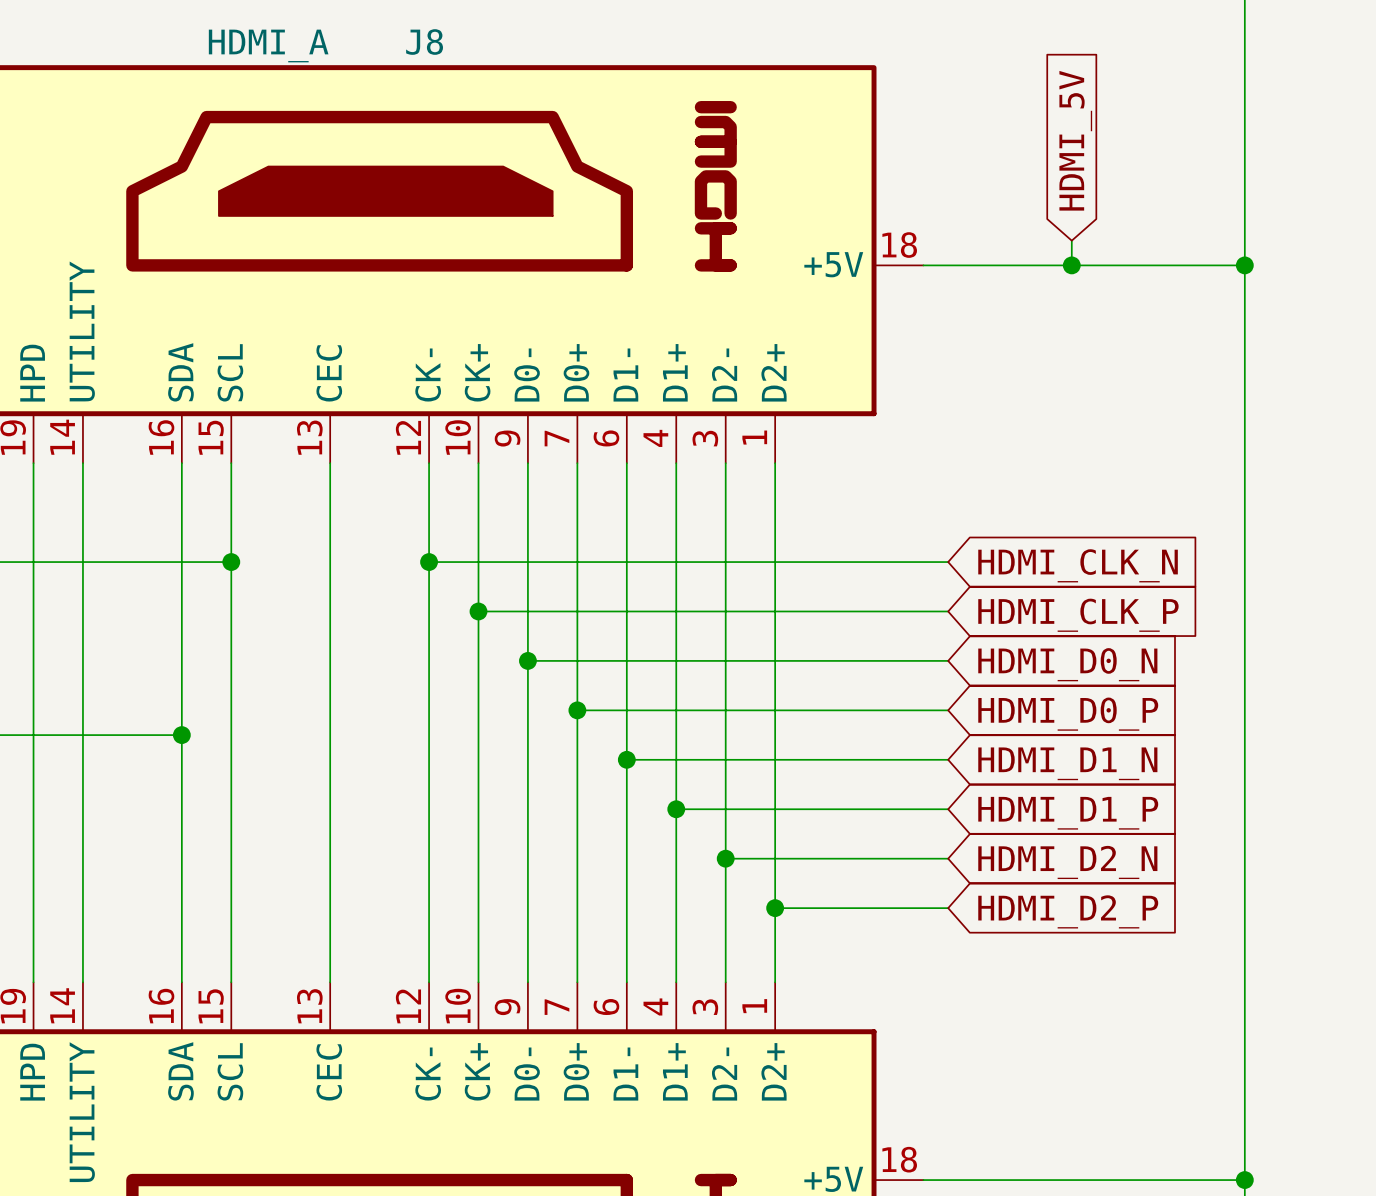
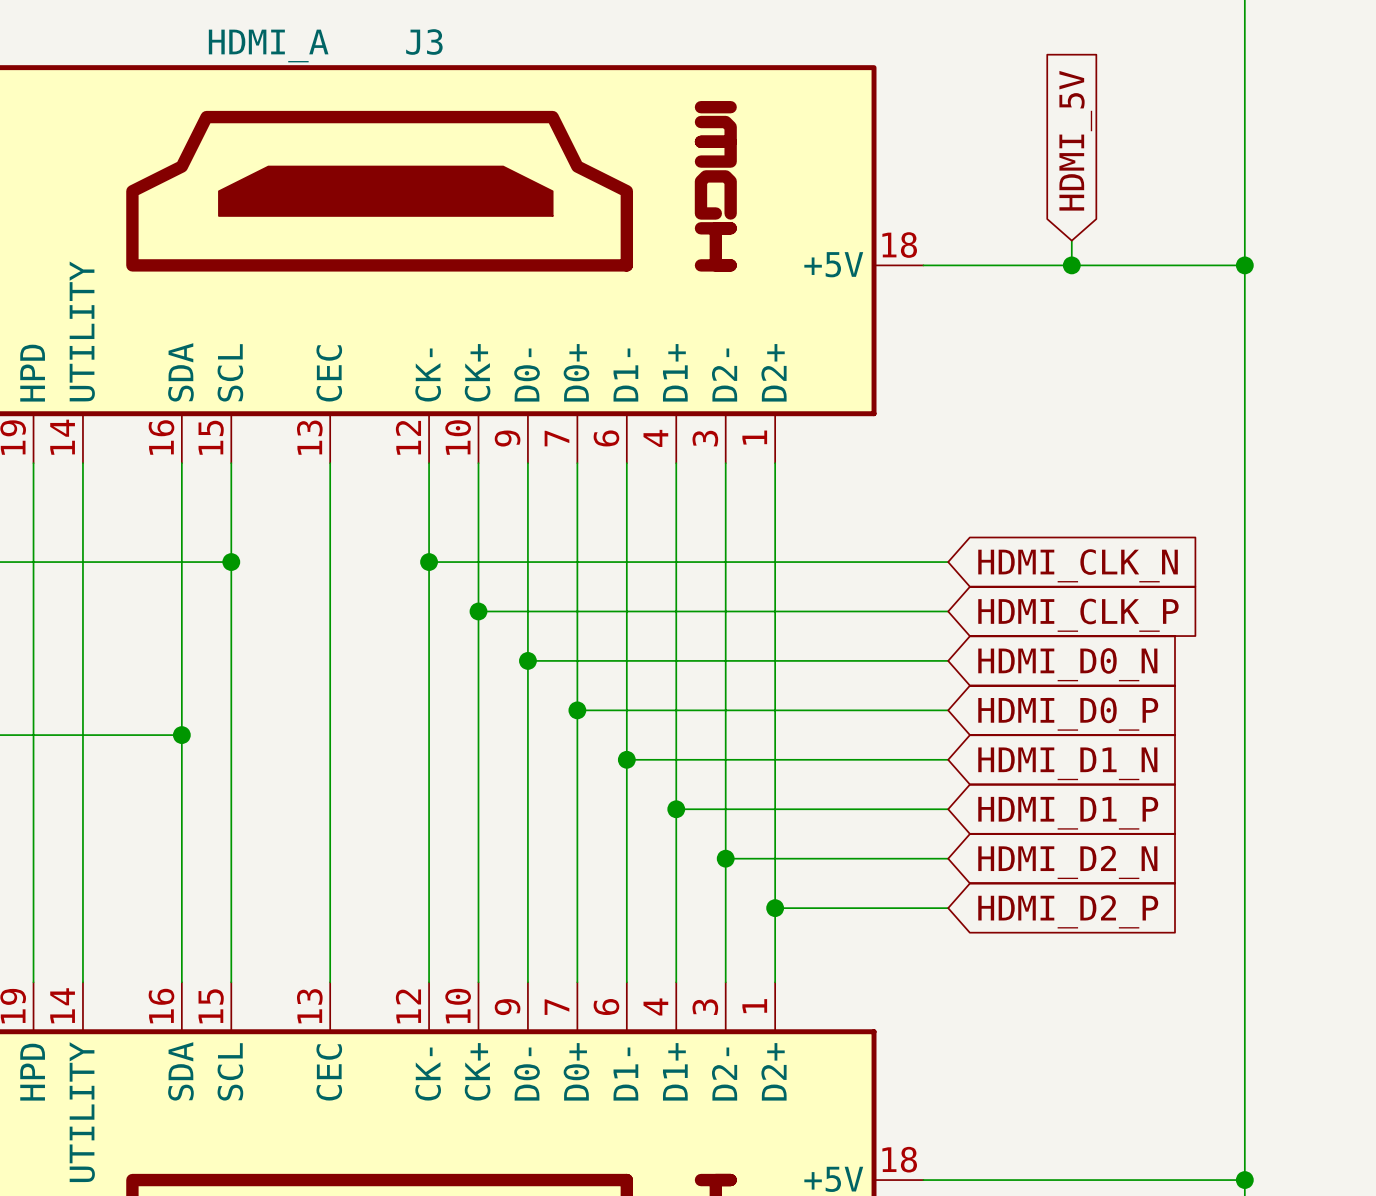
J8 name: J8 (424, 42) -> J3 (424, 42)

